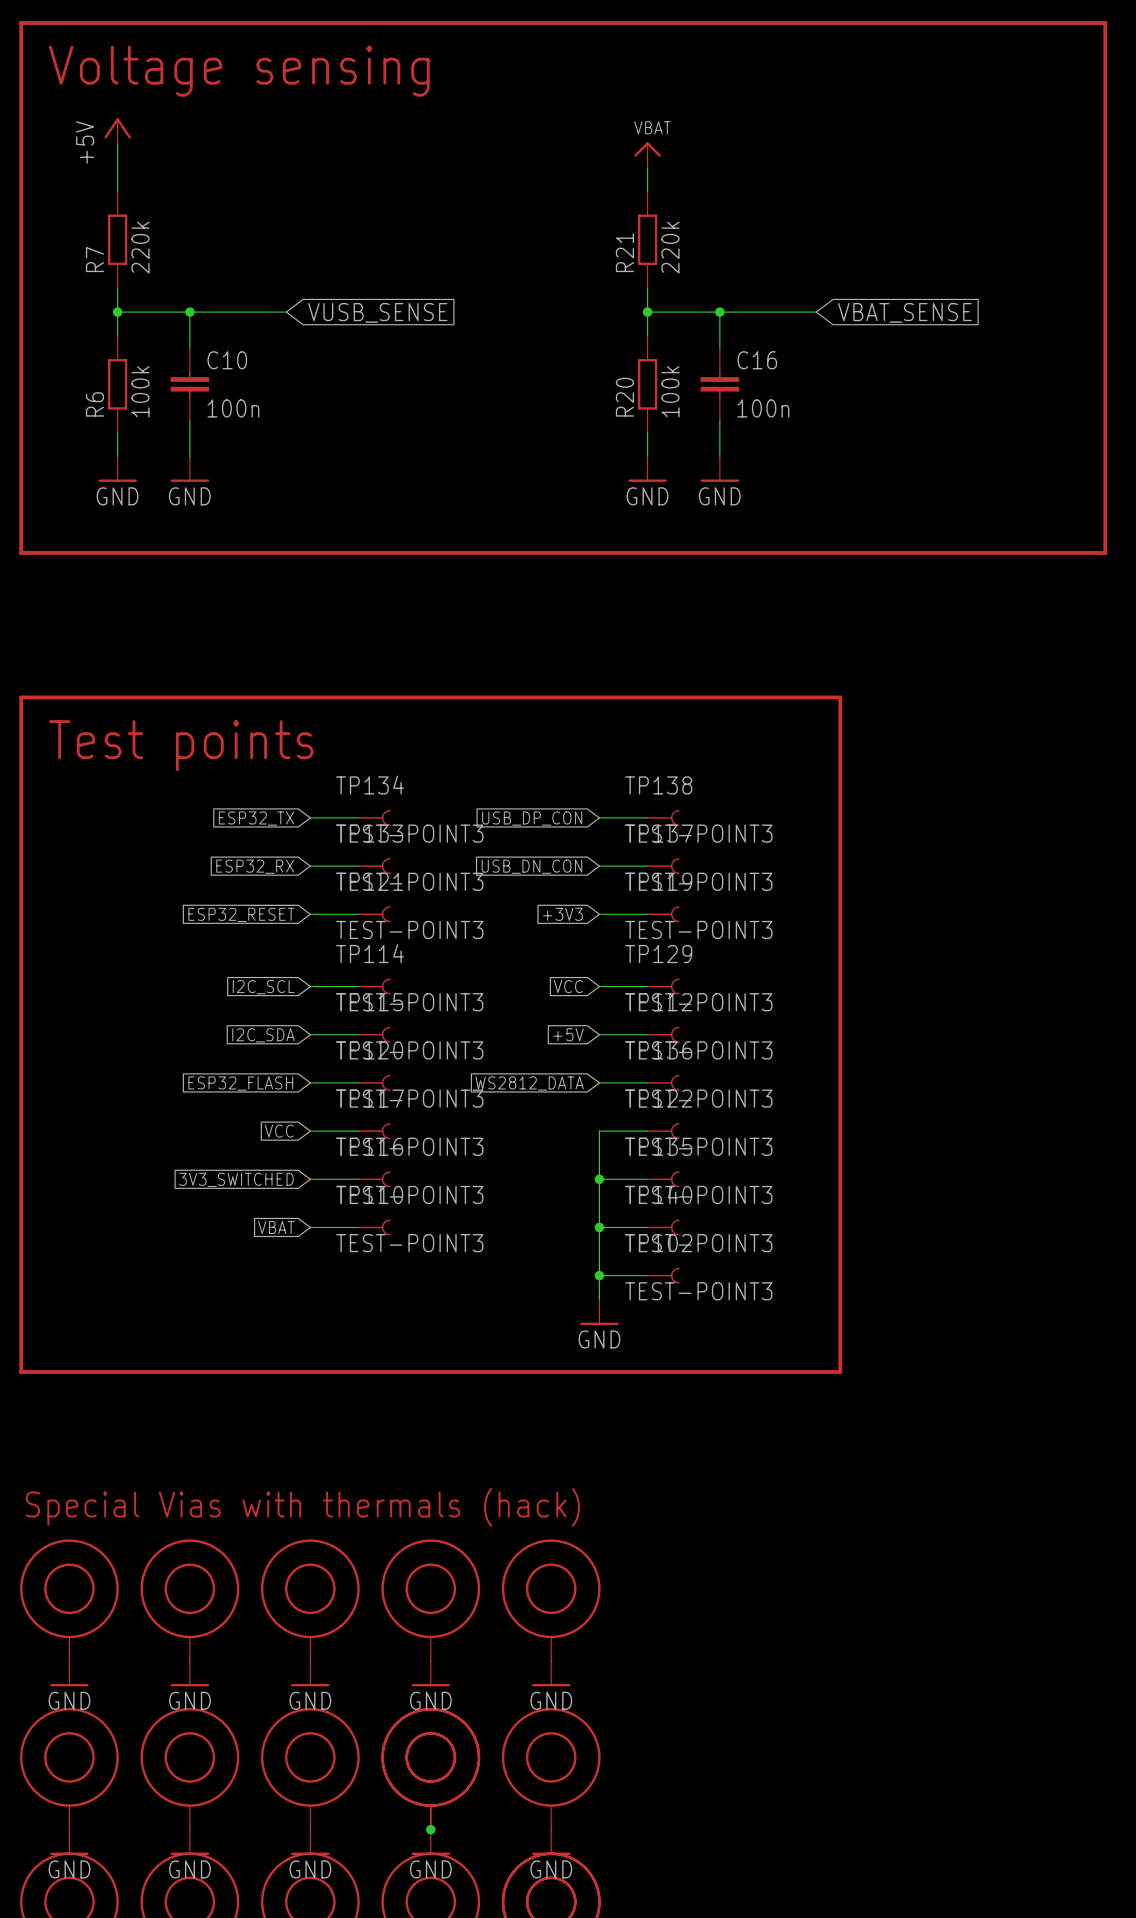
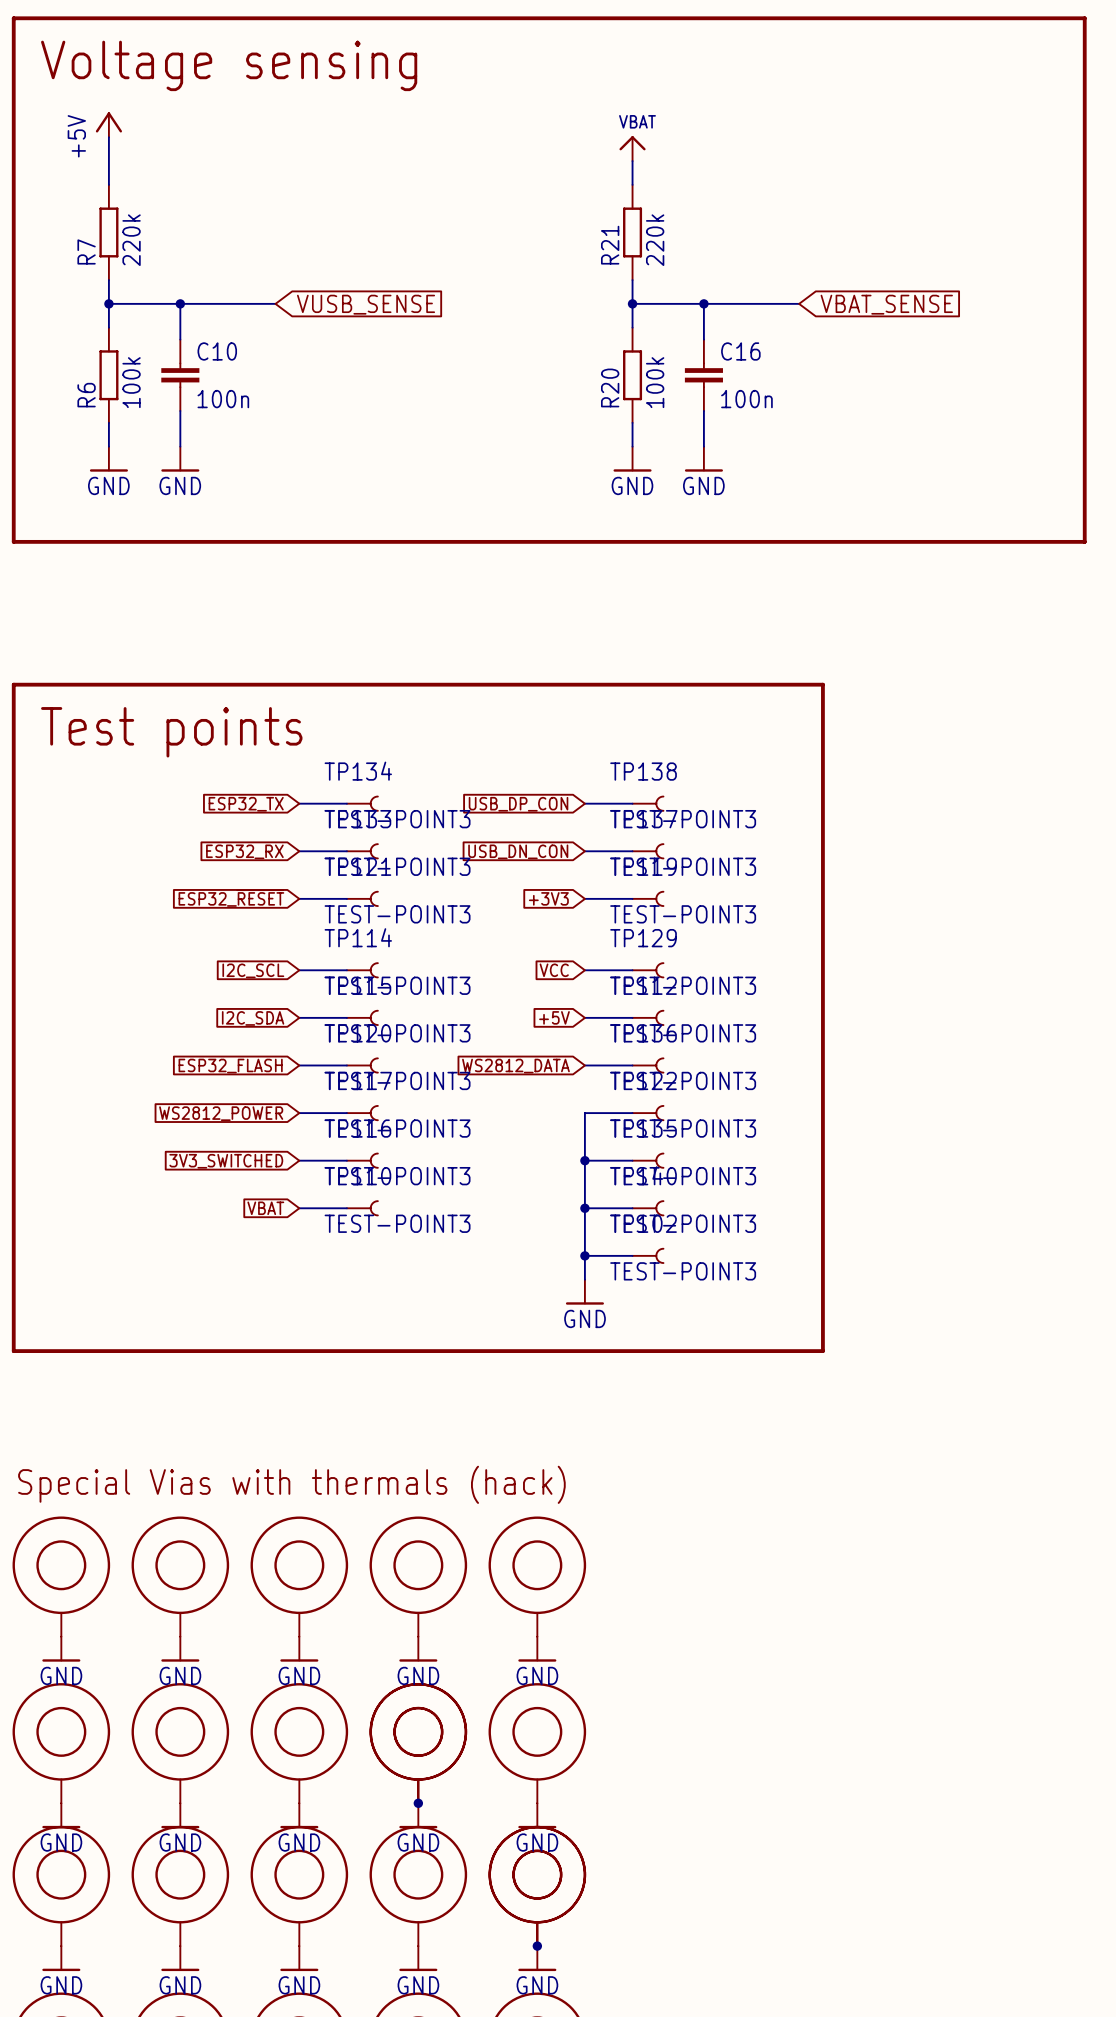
global label: VCC (279, 1131) -> WS2812_POWER (221, 1113)

